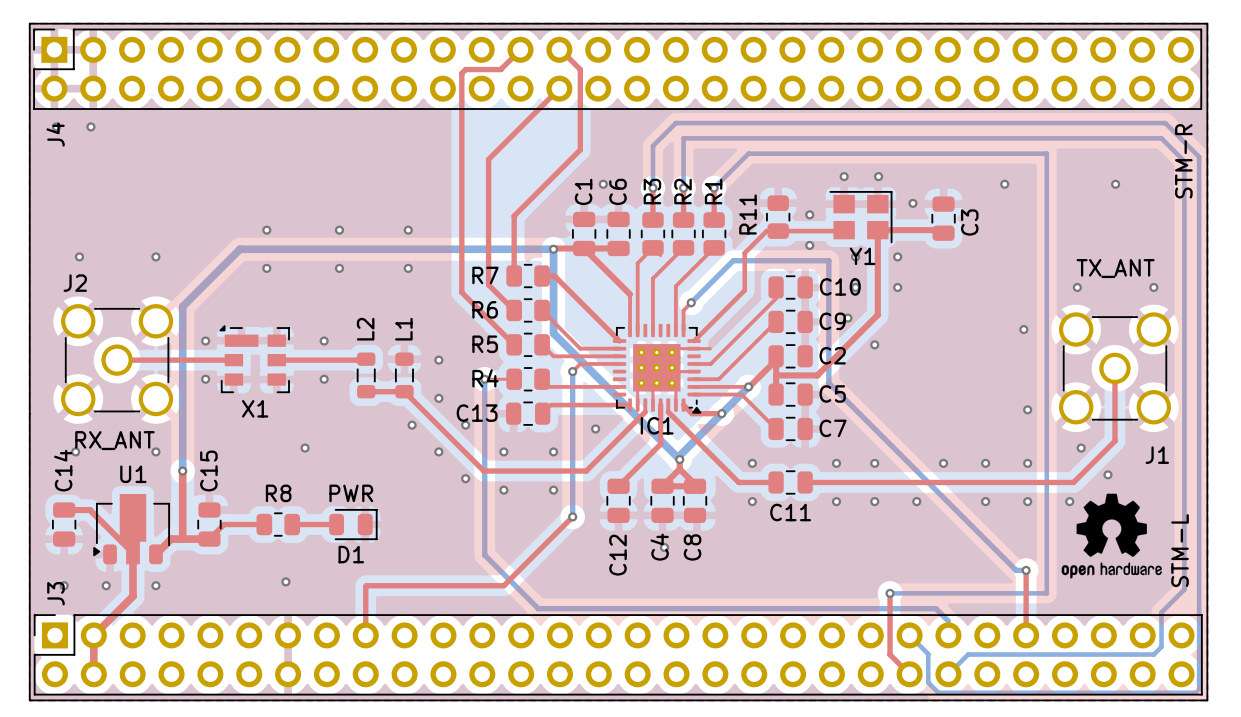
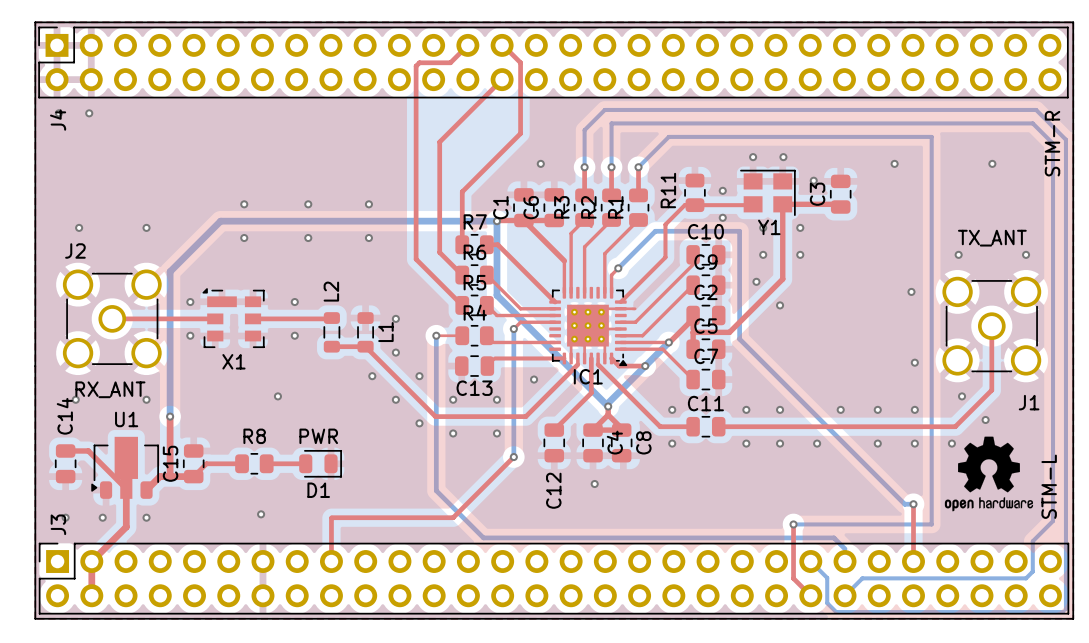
C1 name position: C1 (583, 191) -> C1 (500, 207)
C6 name position: C6 (617, 191) -> C6 (531, 207)
R3 name position: R3 (652, 191) -> R3 (561, 207)
R2 name position: R2 (682, 191) -> R2 (588, 207)
R1 name position: R1 (713, 191) -> R1 (615, 207)
C3 name position: C3 (969, 222) -> C3 (817, 194)
R7 name position: R7 (485, 275) -> R7 (475, 222)
C10 name position: C10 (840, 286) -> C10 (705, 231)
R6 name position: R6 (485, 309) -> R6 (474, 252)
C9 name position: C9 (832, 321) -> C9 (705, 262)
L1 name position: L1 (403, 329) -> L1 (385, 332)
R5 name position: R5 (485, 344) -> R5 (474, 282)
C2 name position: C2 (832, 355) -> C2 (705, 292)
R4 name position: R4 (485, 378) -> R4 (475, 312)
C5 name position: C5 (832, 393) -> C5 (705, 326)
C13 name position: C13 (477, 413) -> C13 (474, 388)
C7 name position: C7 (833, 428) -> C7 (706, 356)
C15 name position: C15 (208, 471) -> C15 (170, 463)
C11 name position: C11 (790, 512) -> C11 (705, 403)
C4 name position: C4 (659, 547) -> C4 (614, 442)
C8 name position: C8 (692, 547) -> C8 (643, 442)

